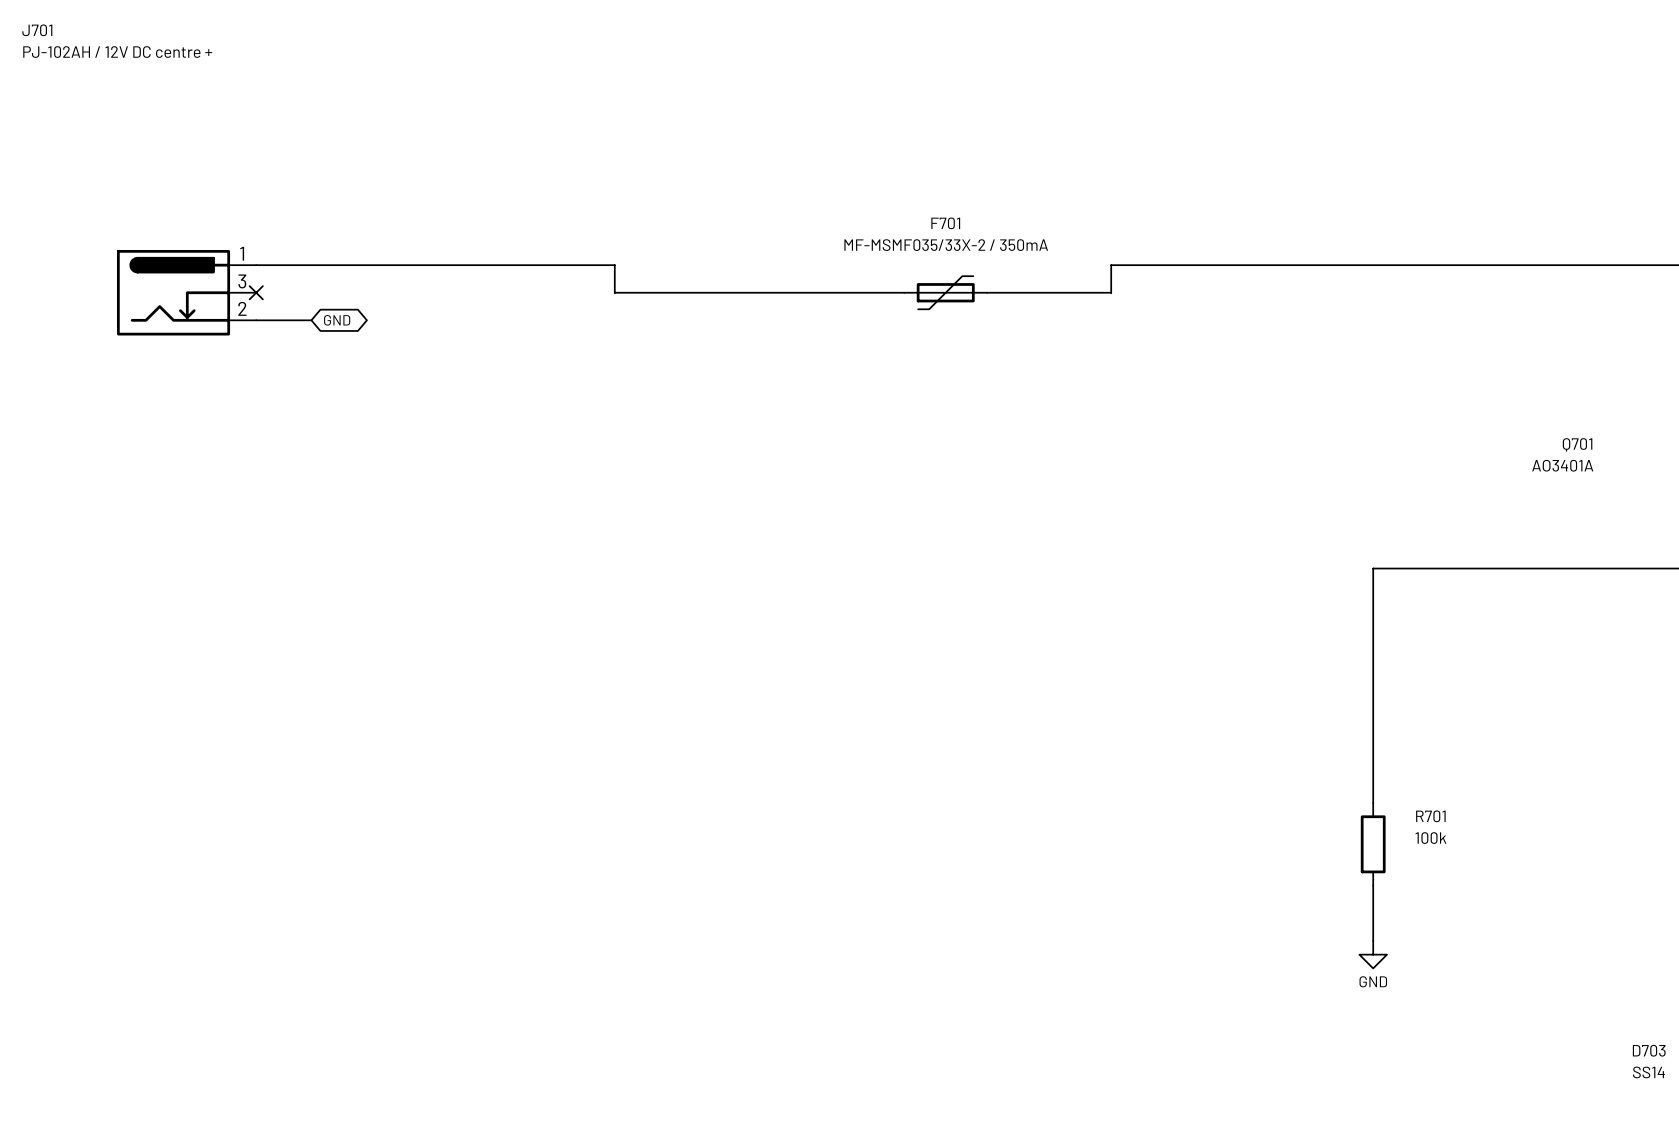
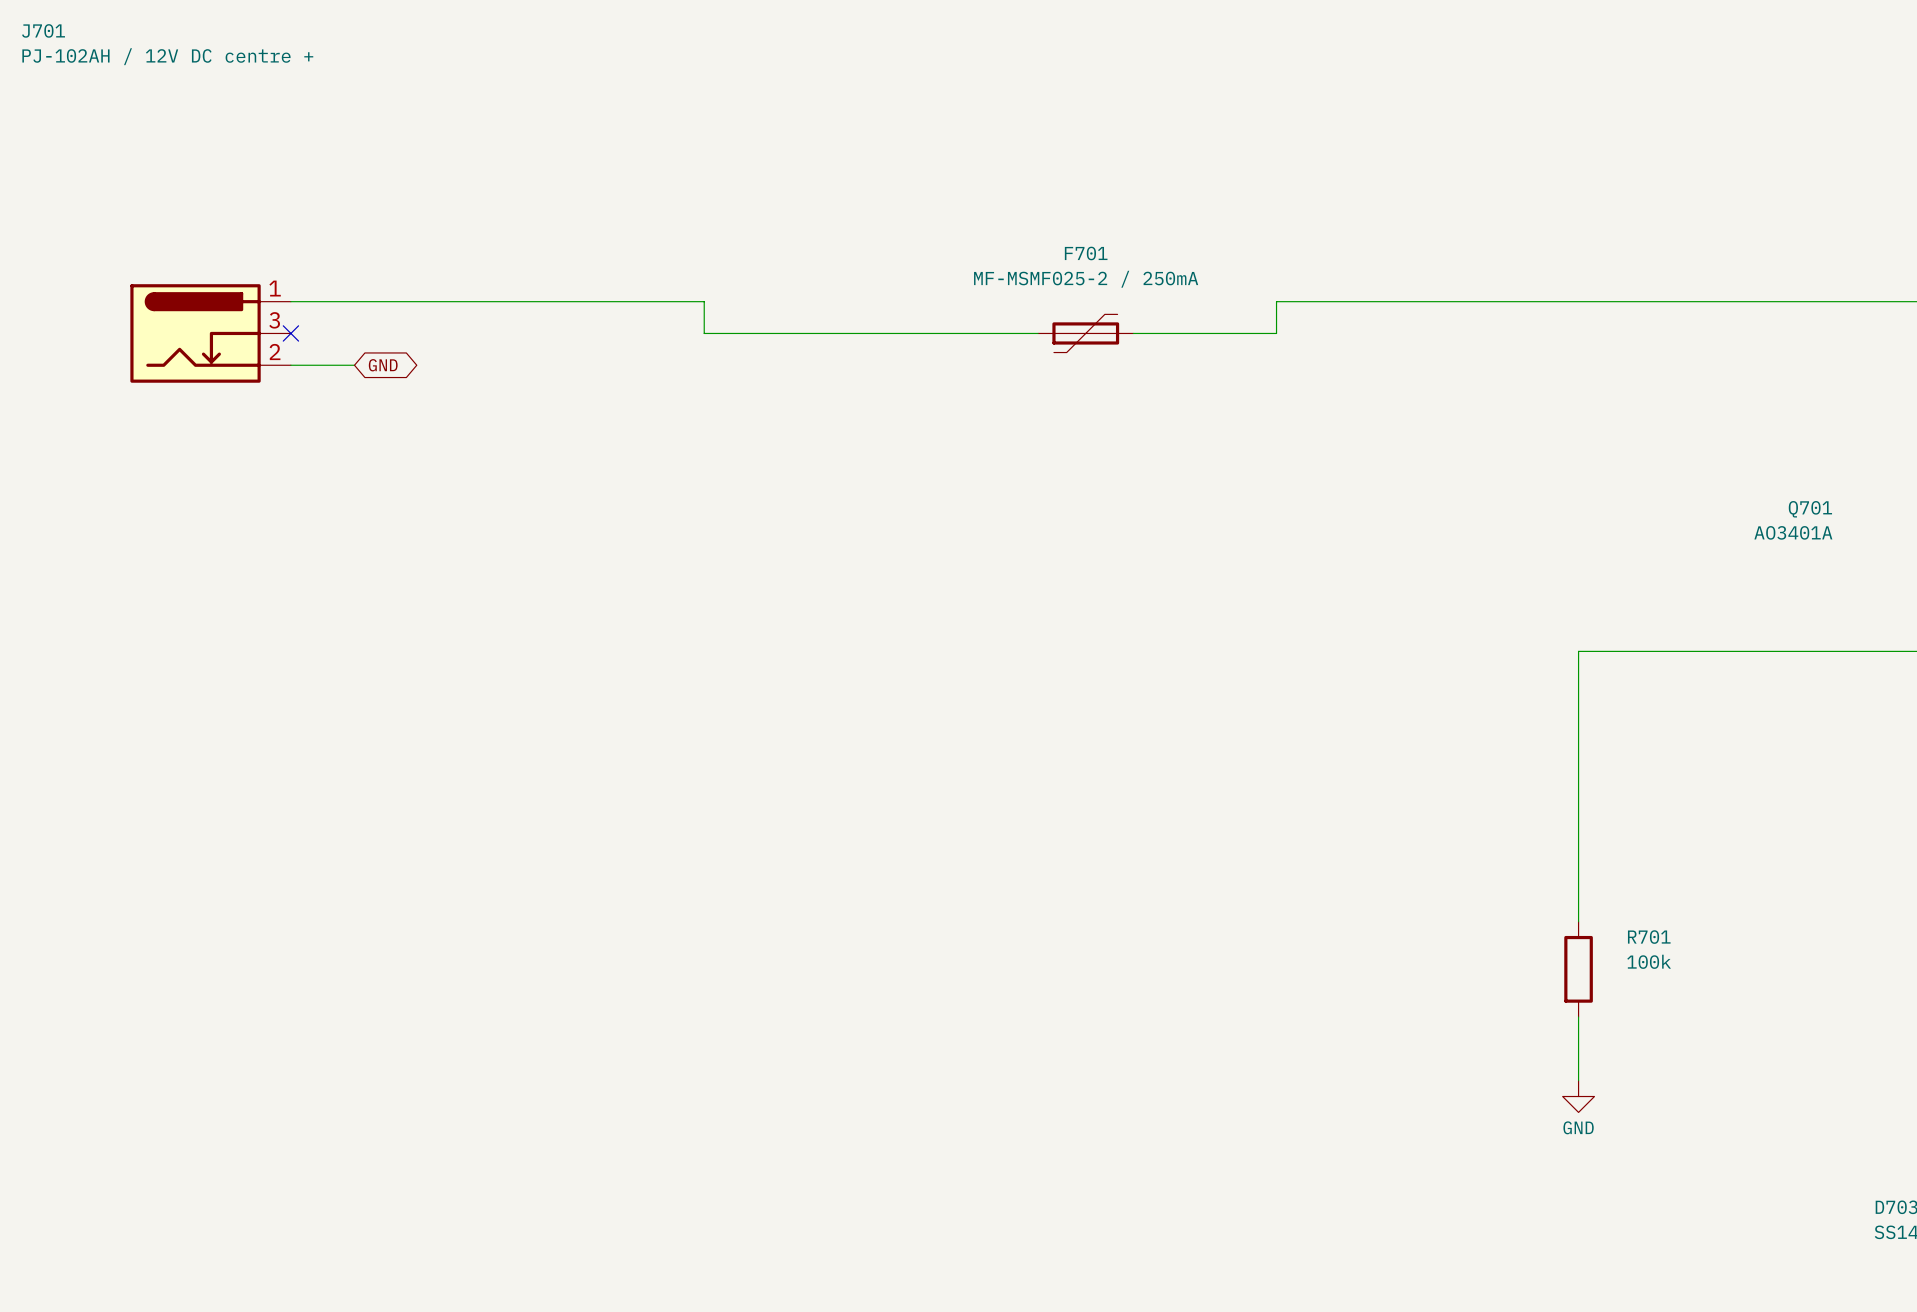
F701 value: MF-MSMF035/33X-2 / 350mA (946, 245) -> MF-MSMF025-2 / 250mA (1086, 279)

